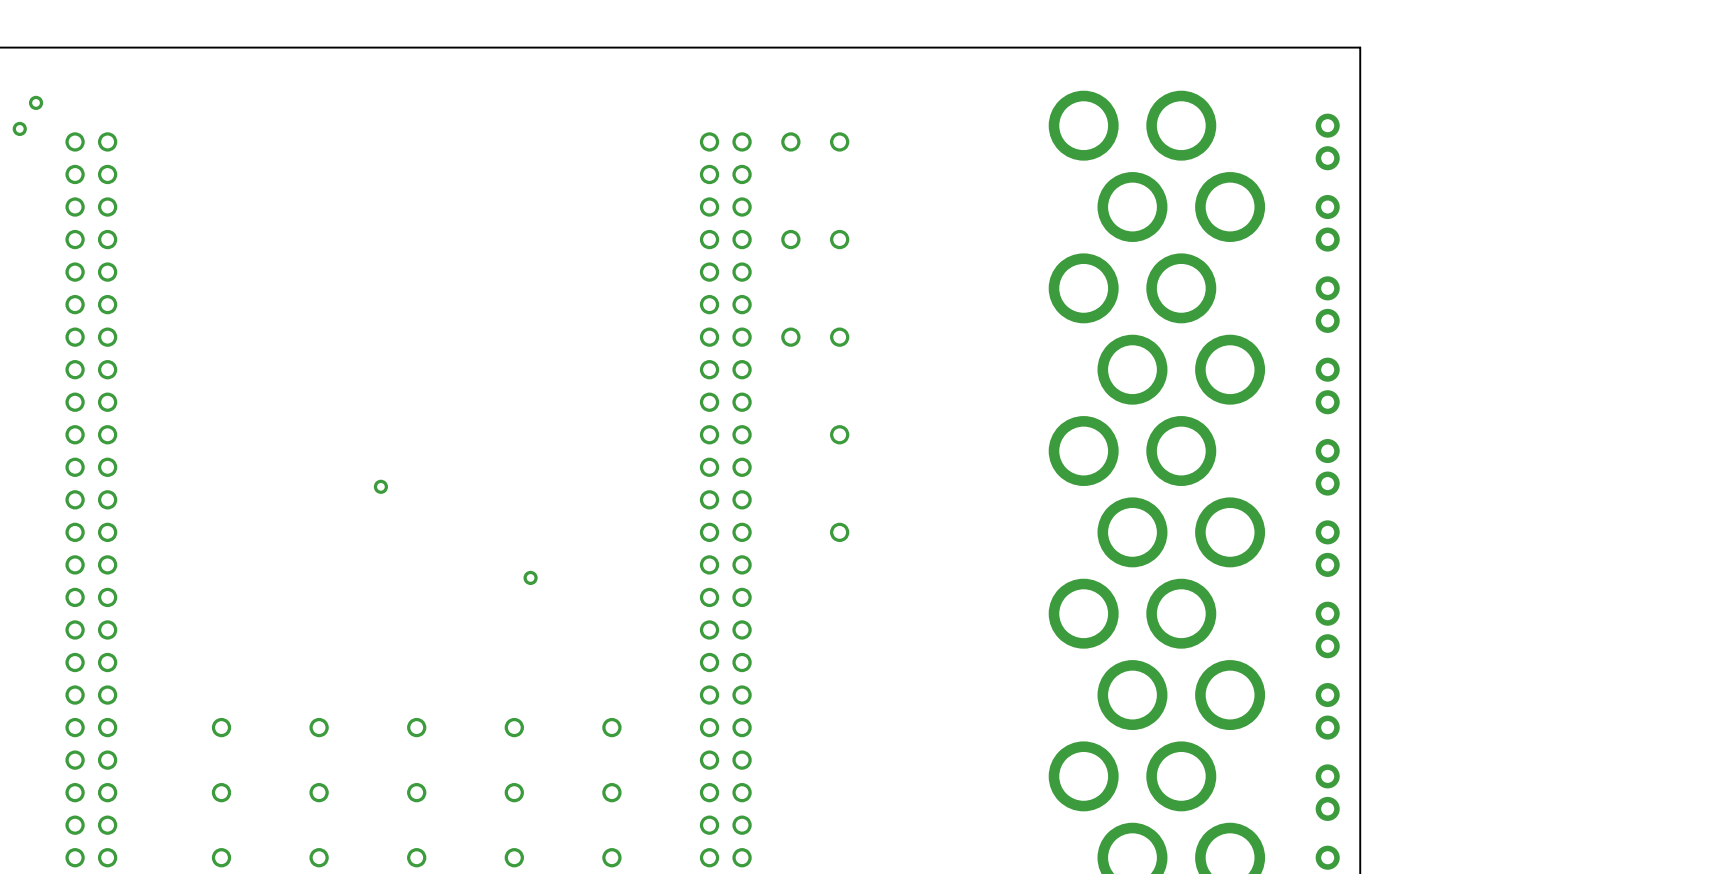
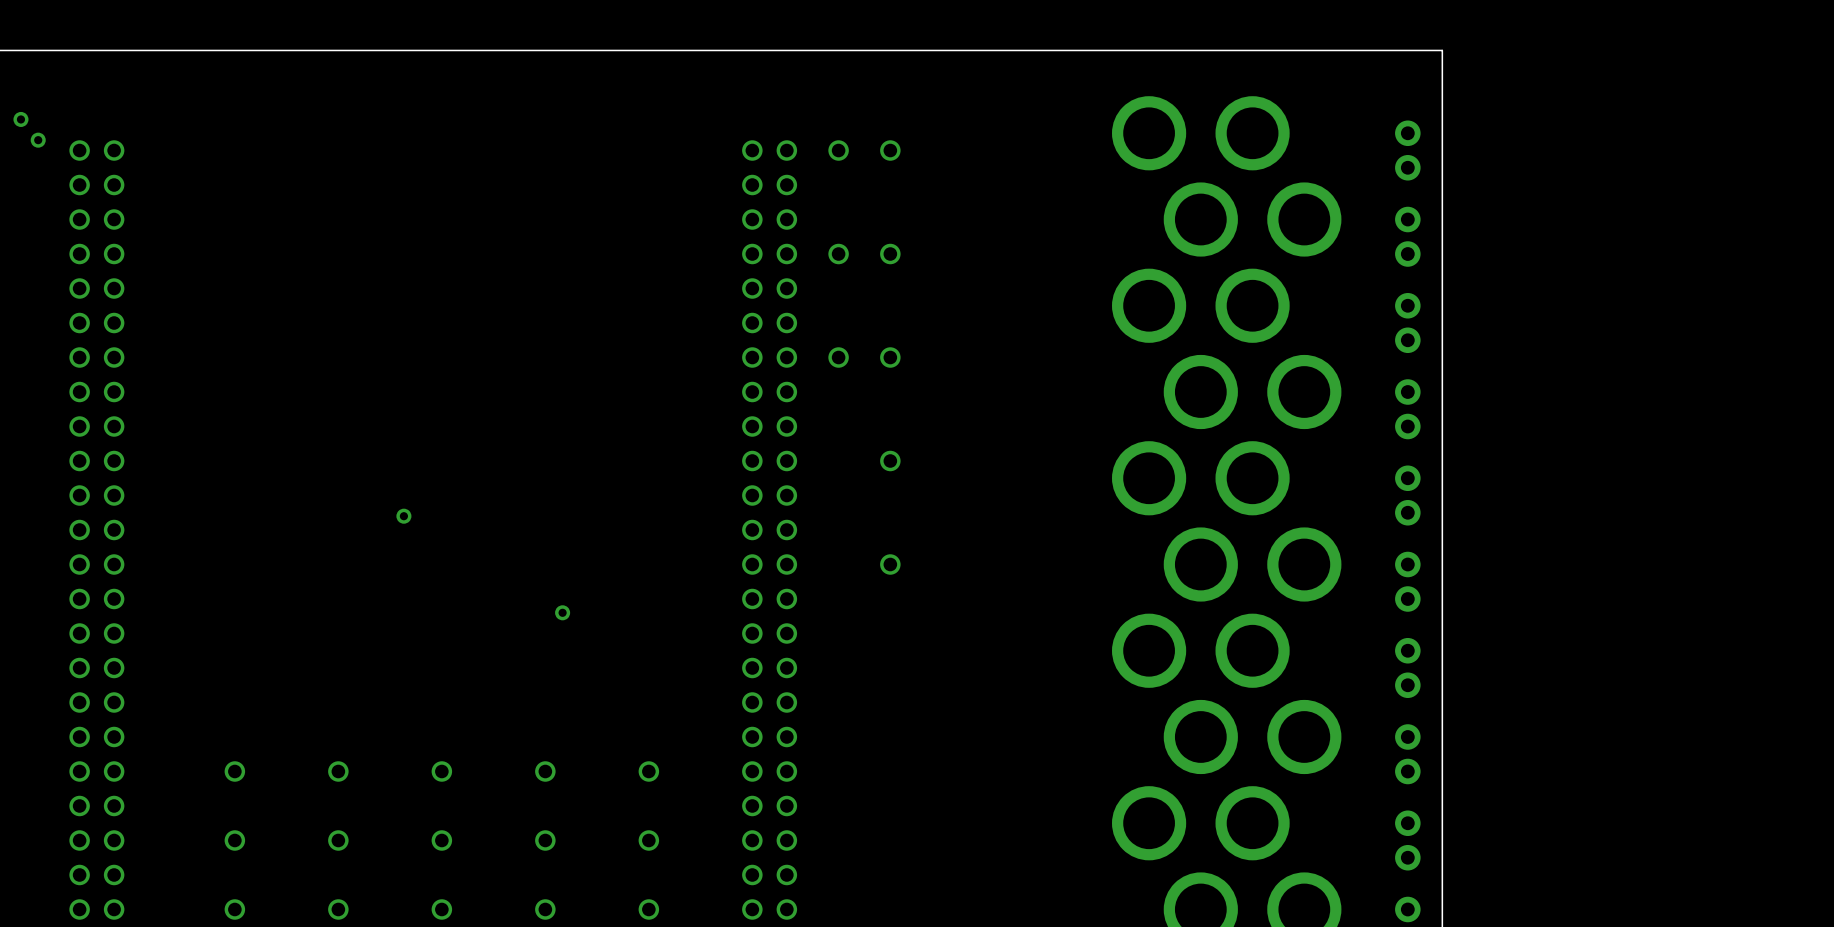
via: (36, 102) -> none
via: none -> (20, 119)
via: (19, 128) -> none
via: none -> (38, 140)

